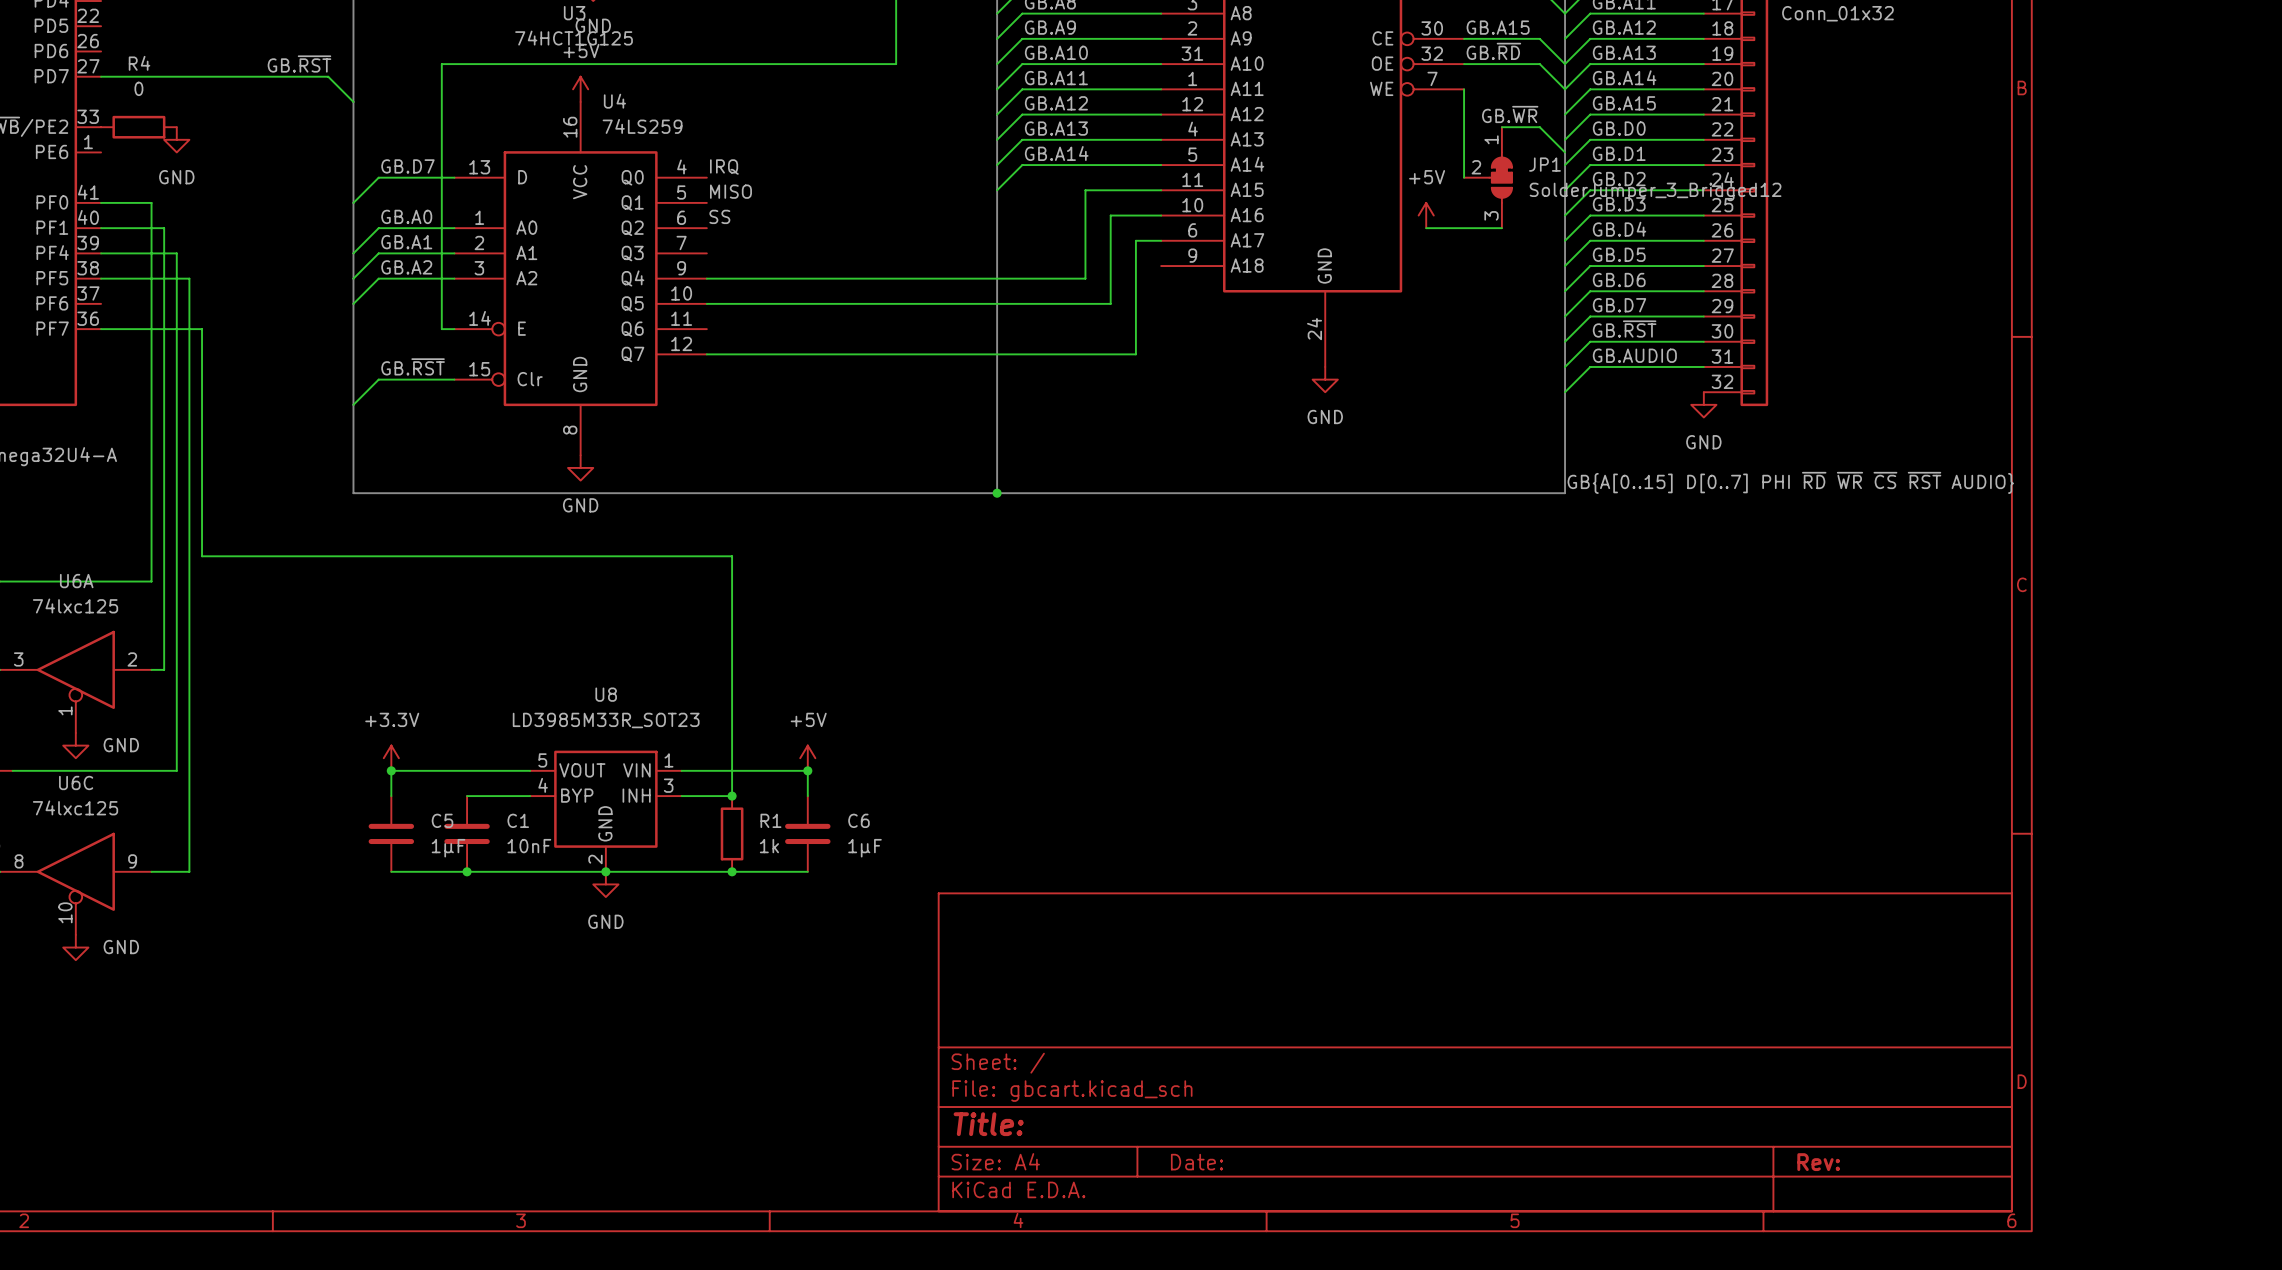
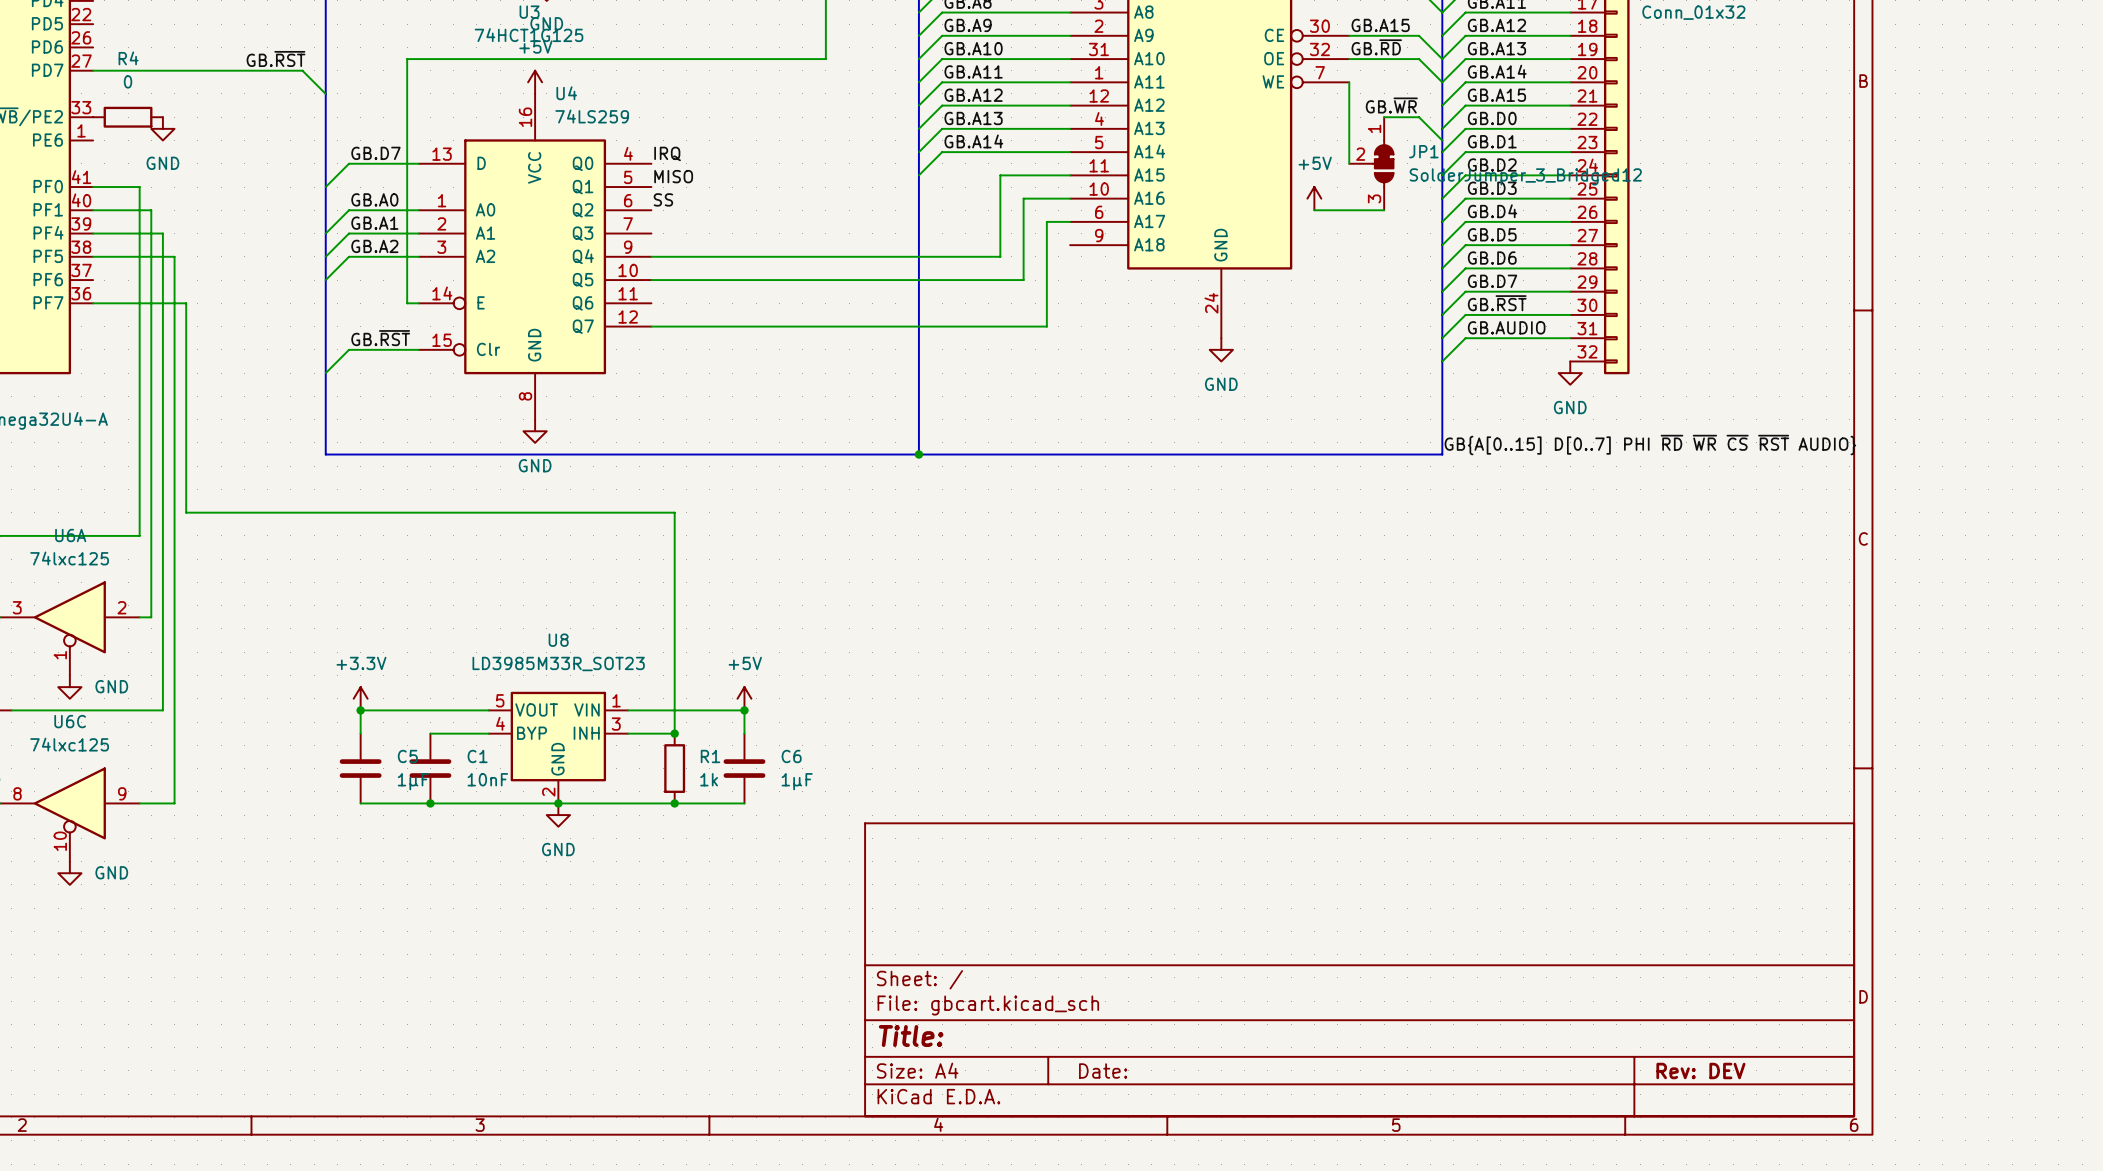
title block: Rev: (1818, 1162) -> Rev: DEV (1700, 1070)

